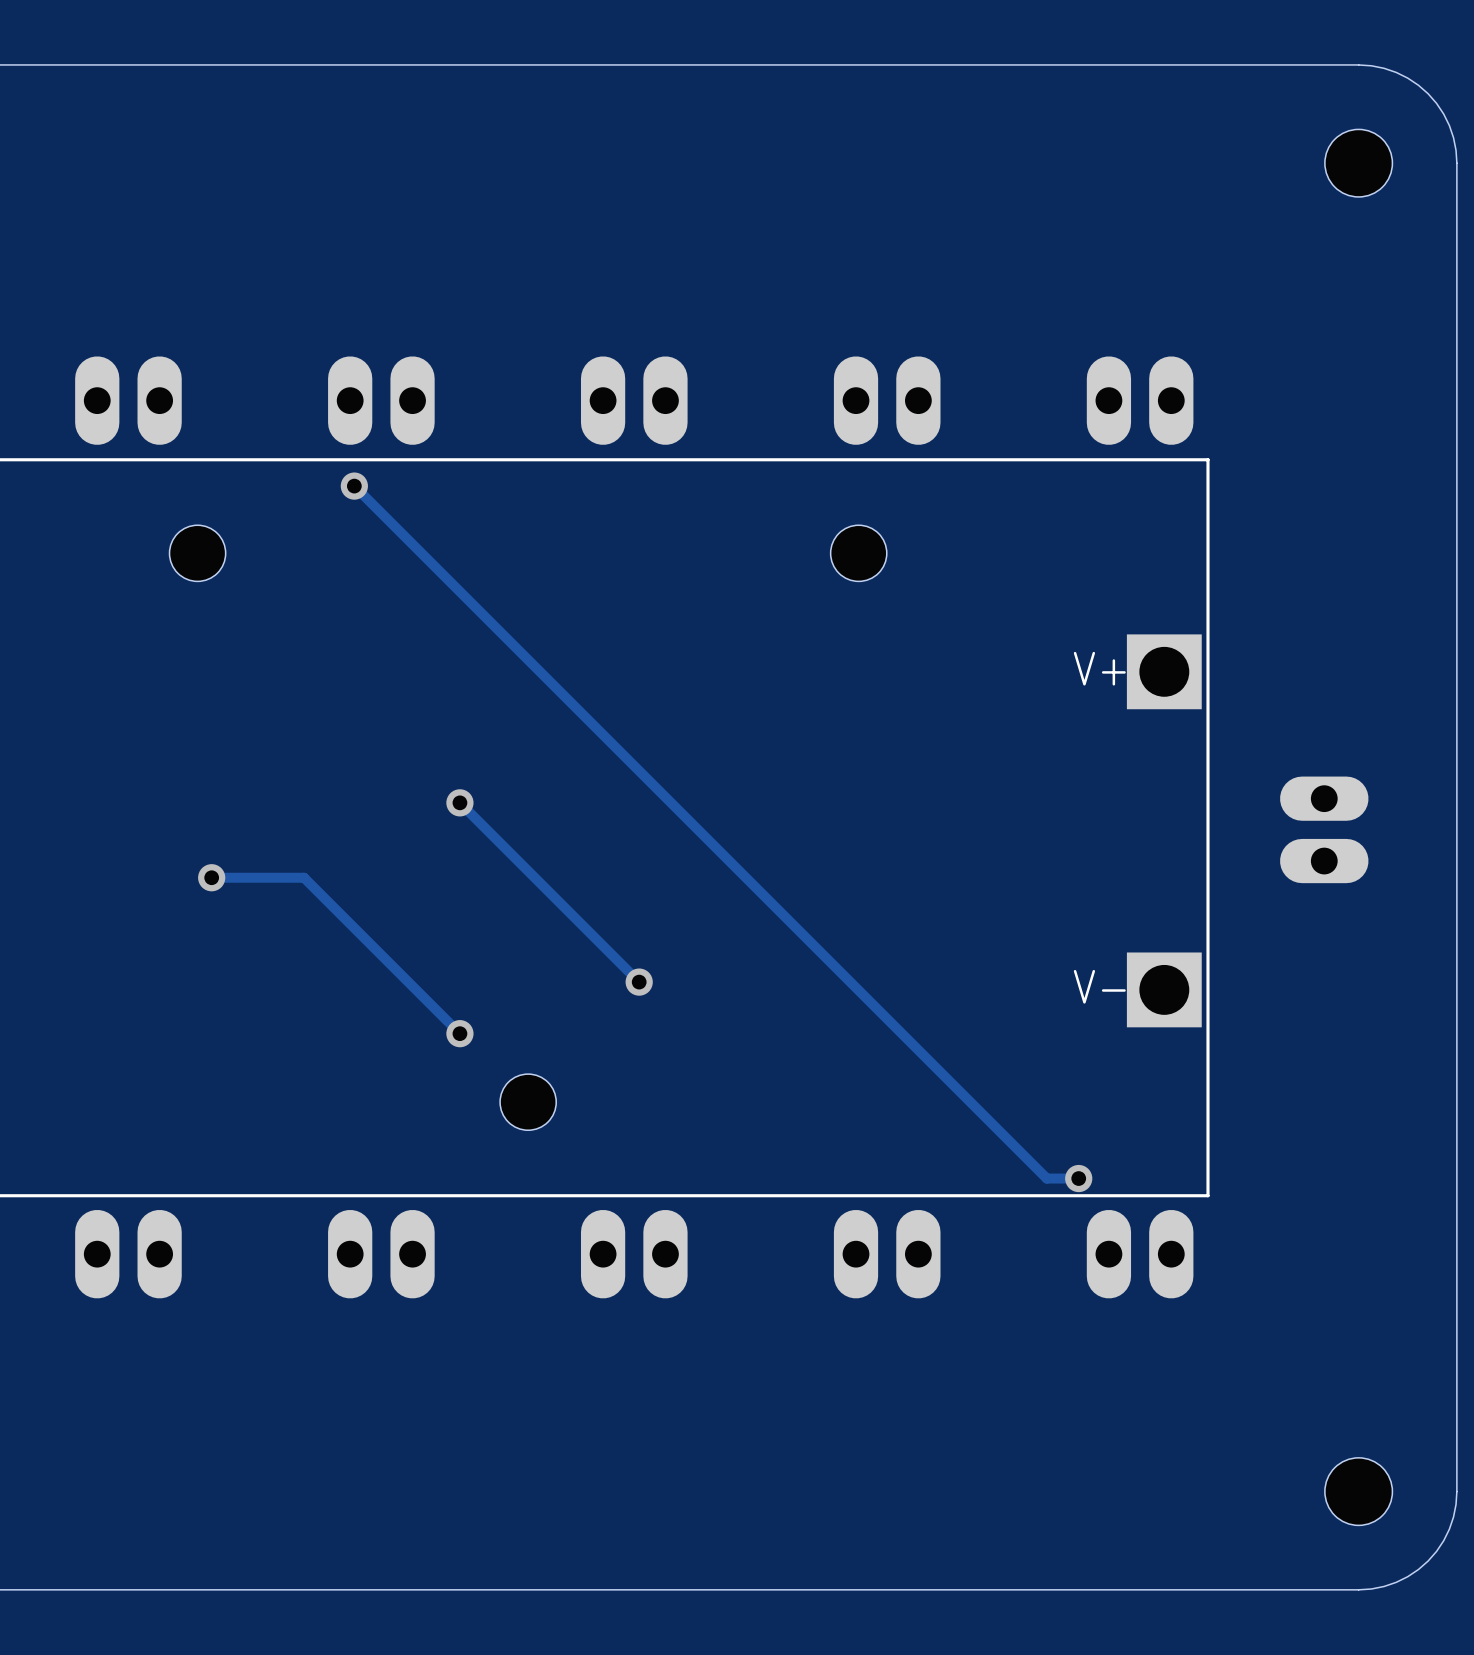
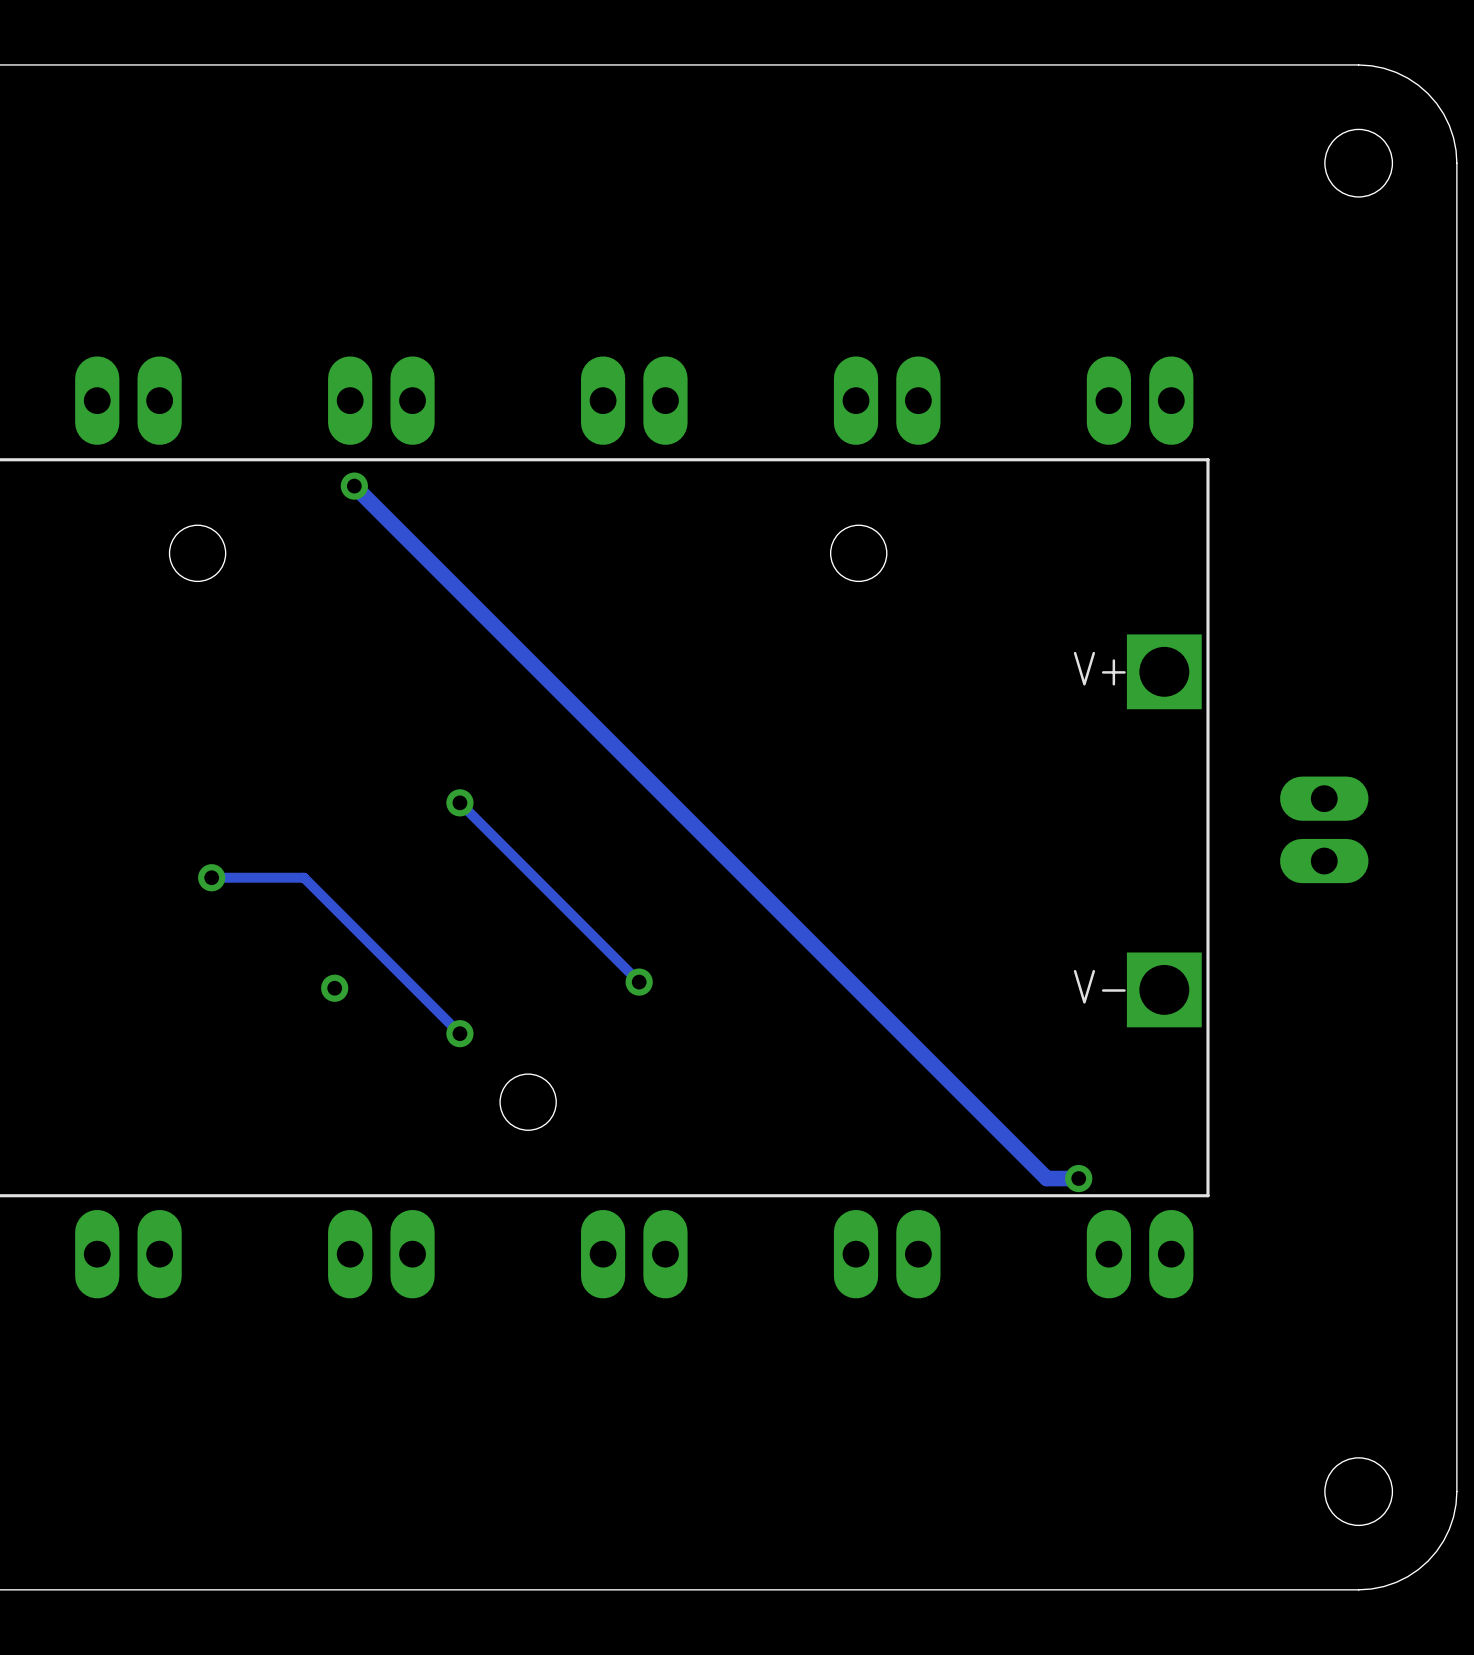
track width: thin (354, 486) (1046, 1178) (1078, 1178) -> thick (354, 486) (1046, 1178) (1078, 1178)
via: none -> (334, 988)

